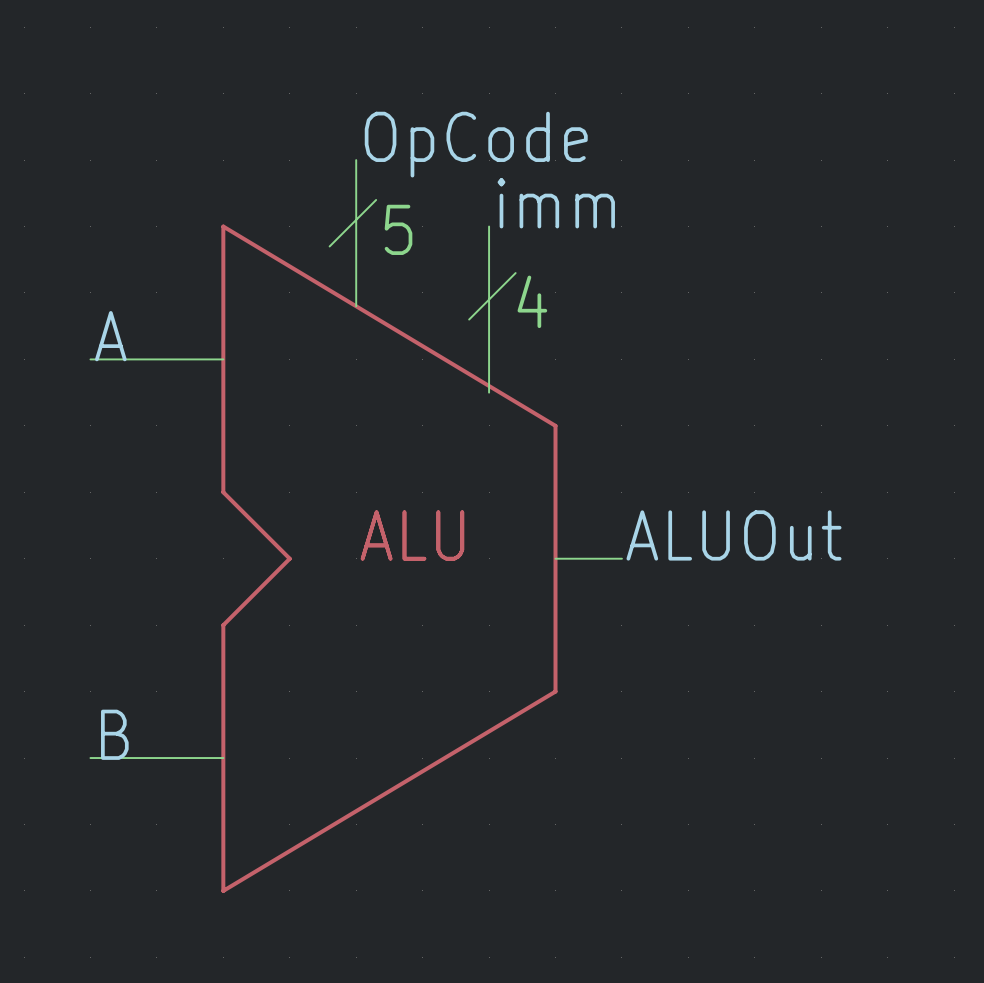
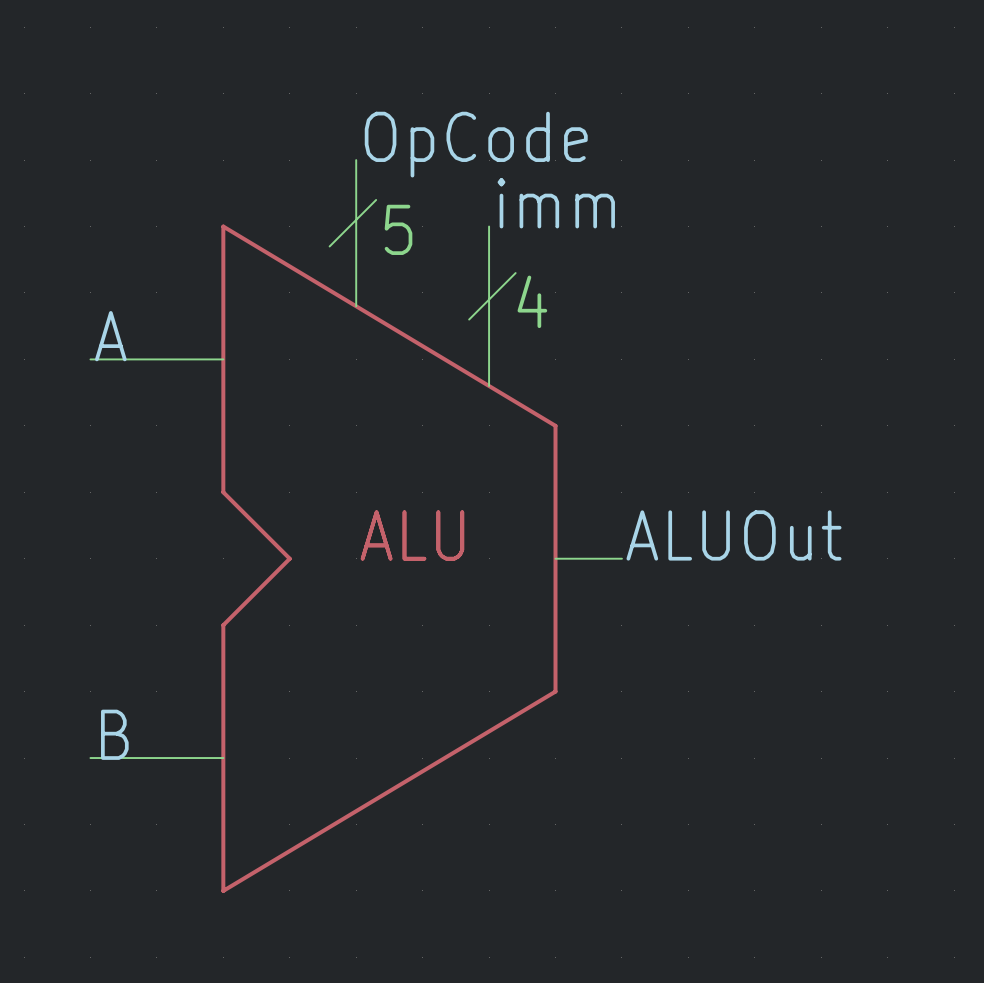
wire: (489, 385) (489, 392) -> none

